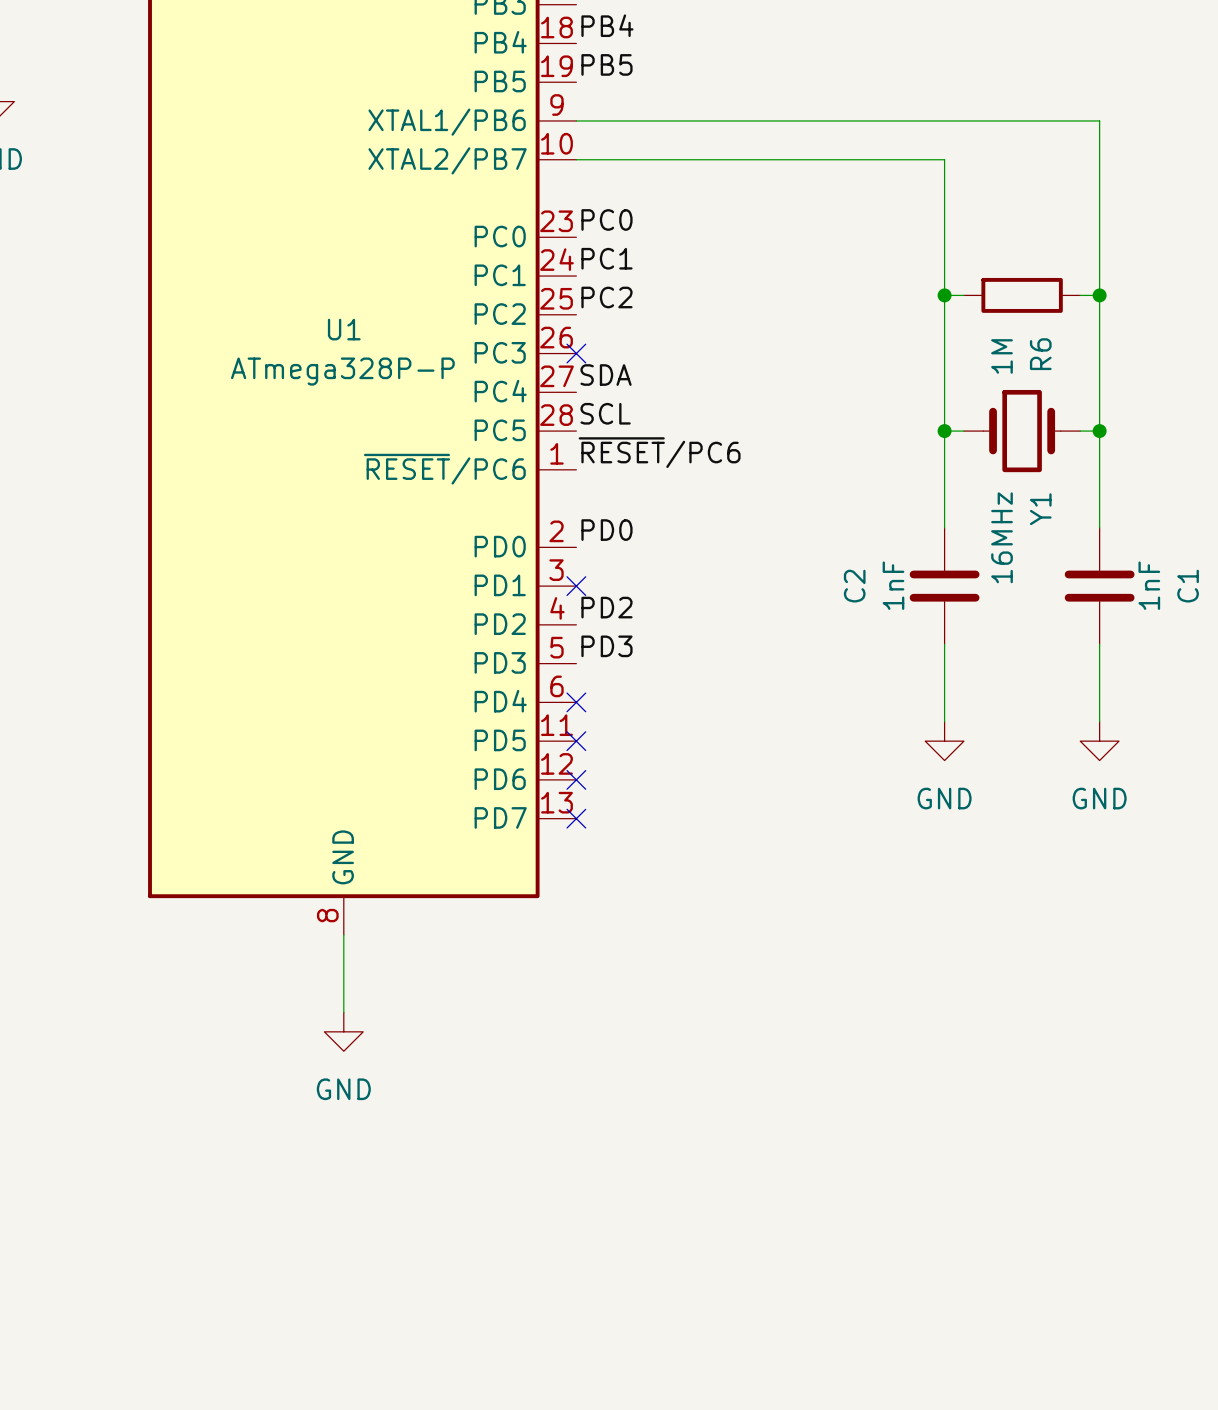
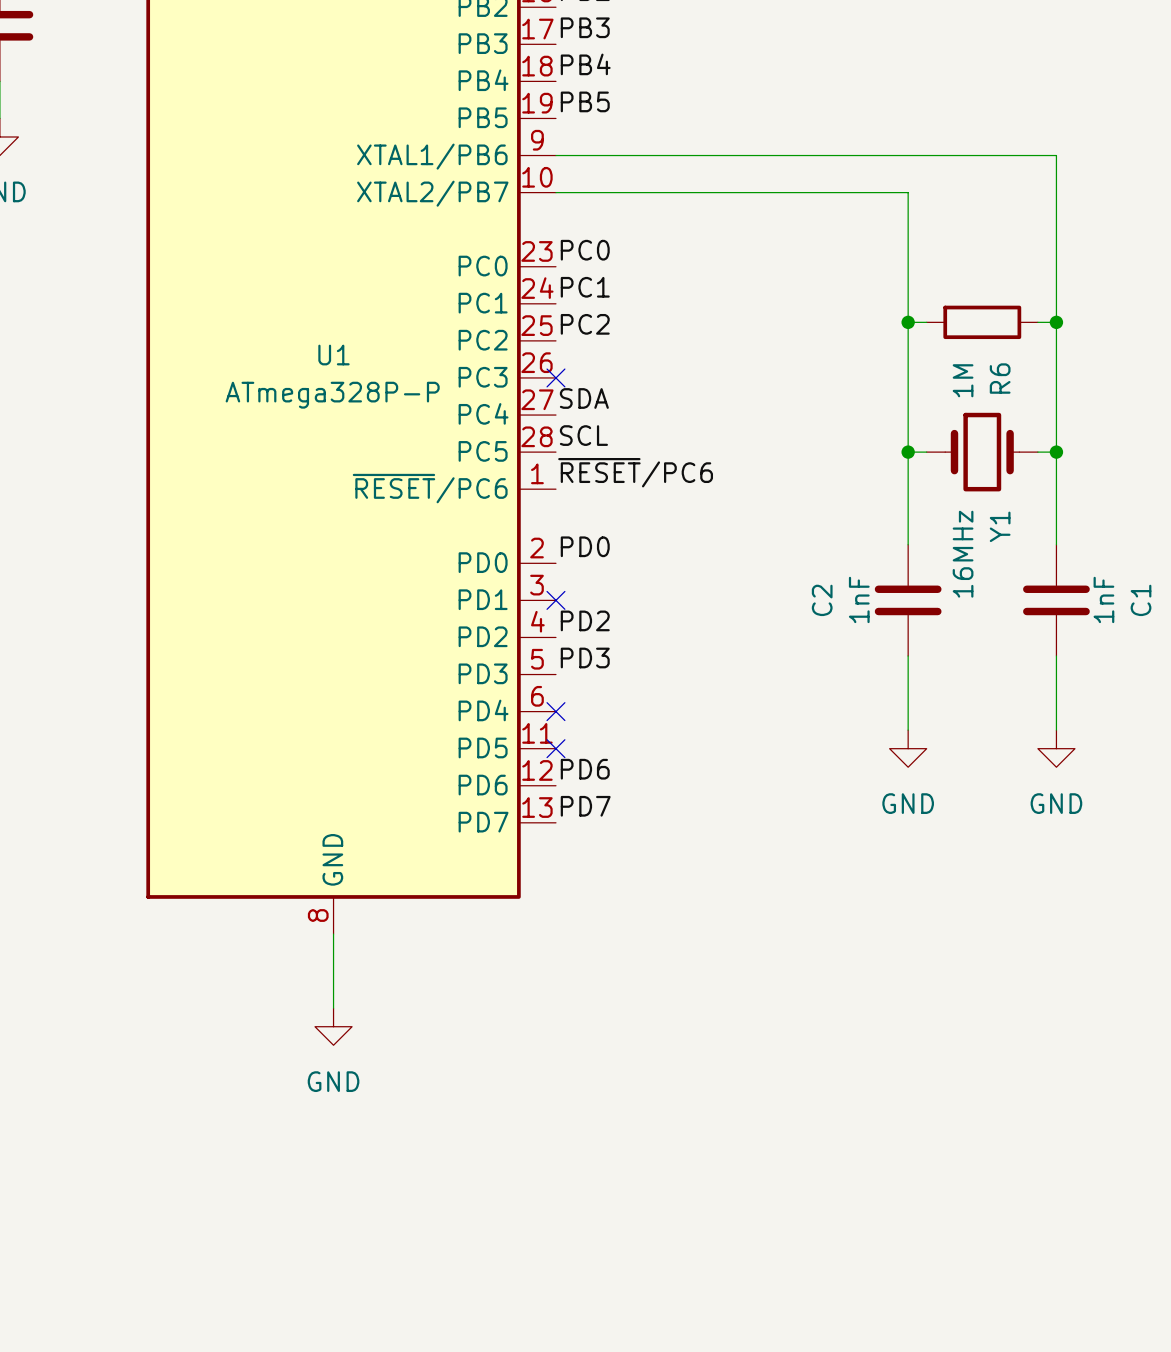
label: none -> PD6 (585, 769)
no-connect mark: (576, 779) -> none
label: none -> PD7 (585, 806)
no-connect mark: (576, 818) -> none

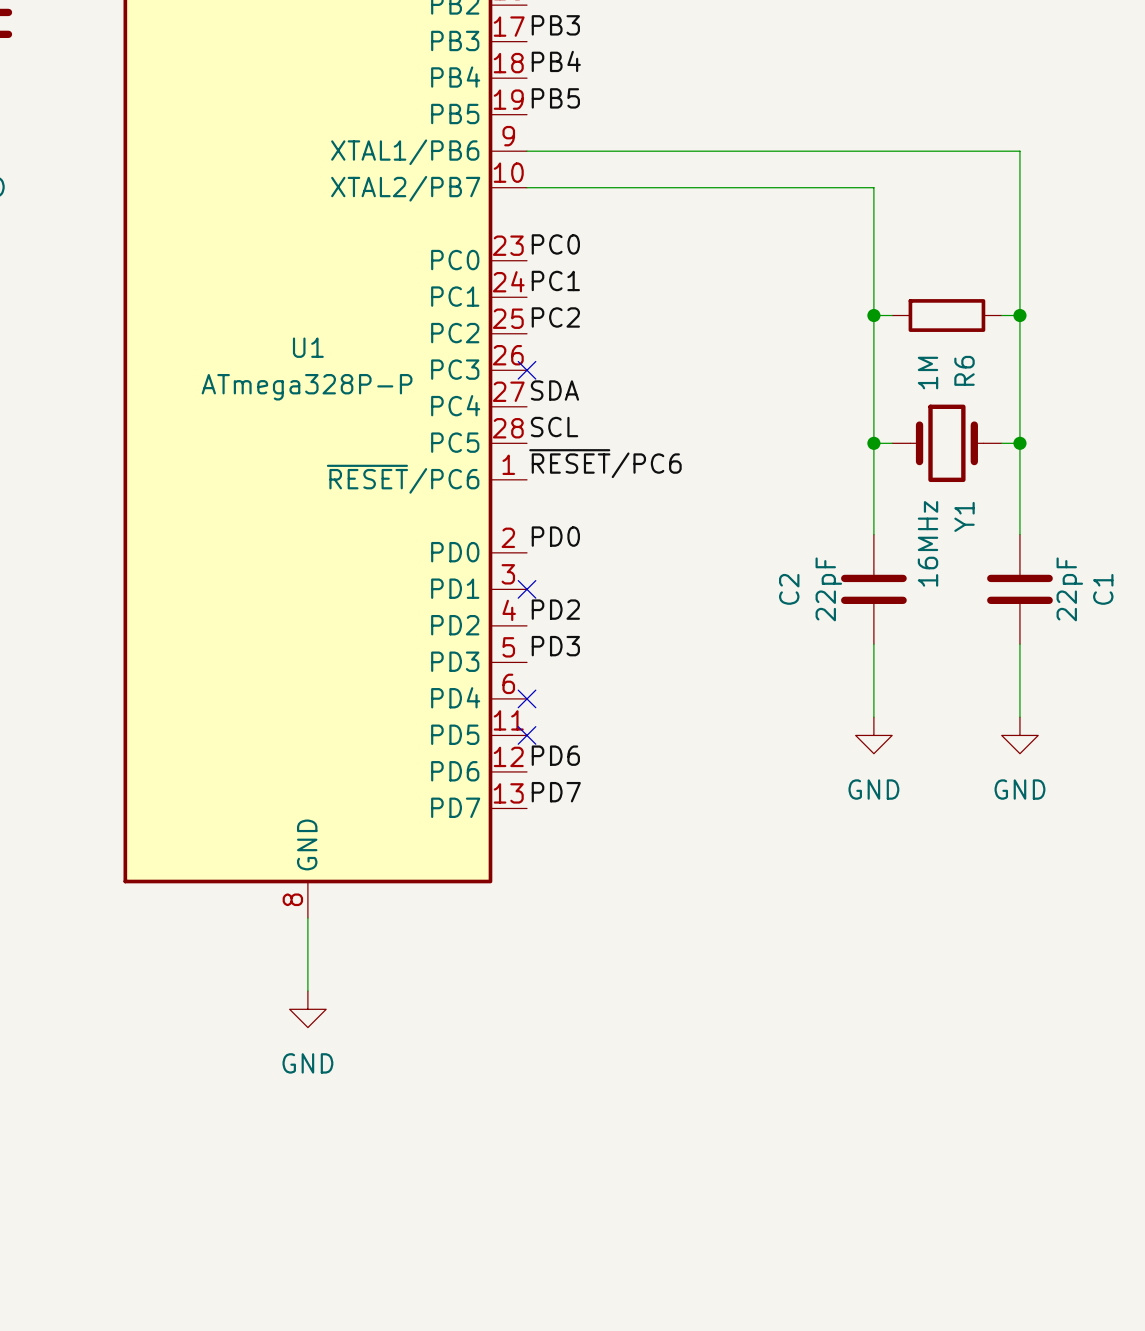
C2 value: 1nF (859, 599) -> 22pF (828, 589)
C1 value: 1nF (1103, 599) -> 22pF (1069, 589)

